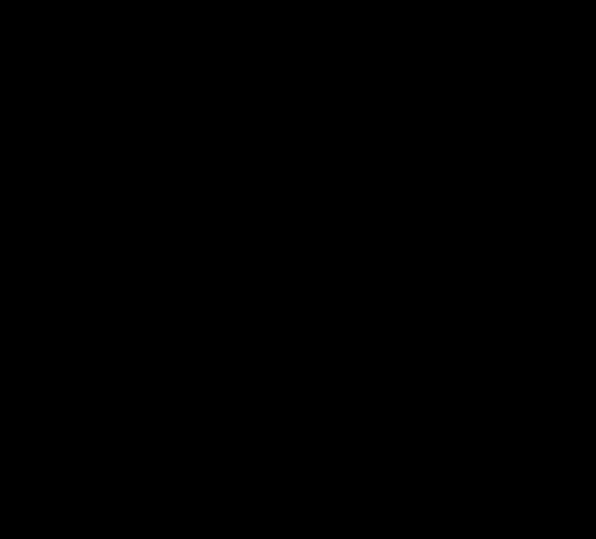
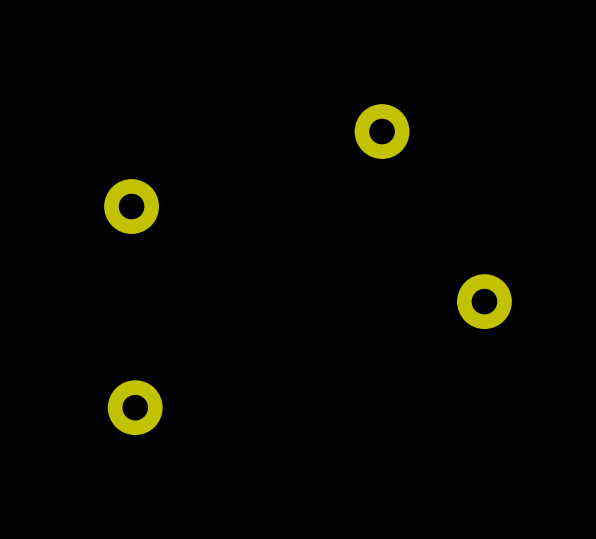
part: none -> (382, 131)
part: none -> (131, 206)
part: none -> (484, 301)
part: none -> (135, 407)

